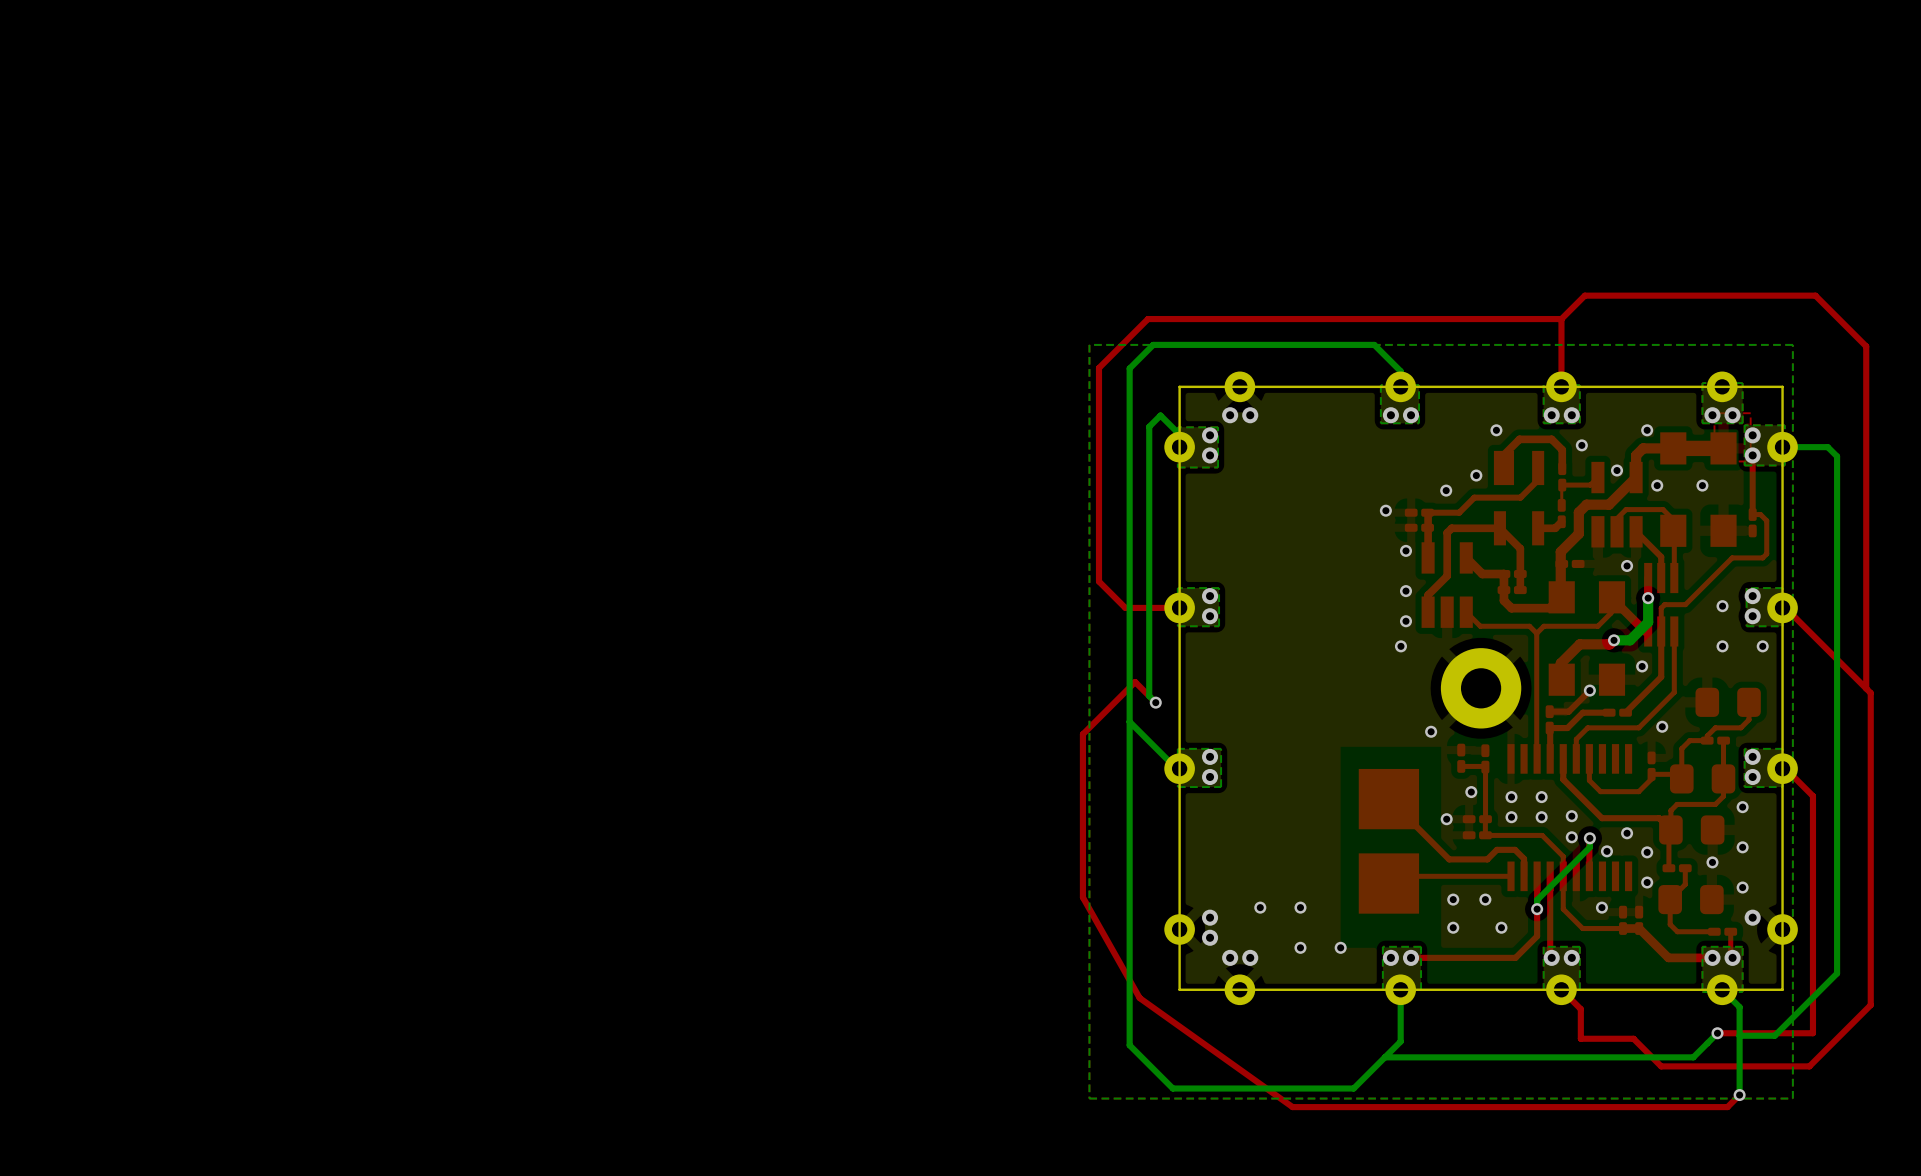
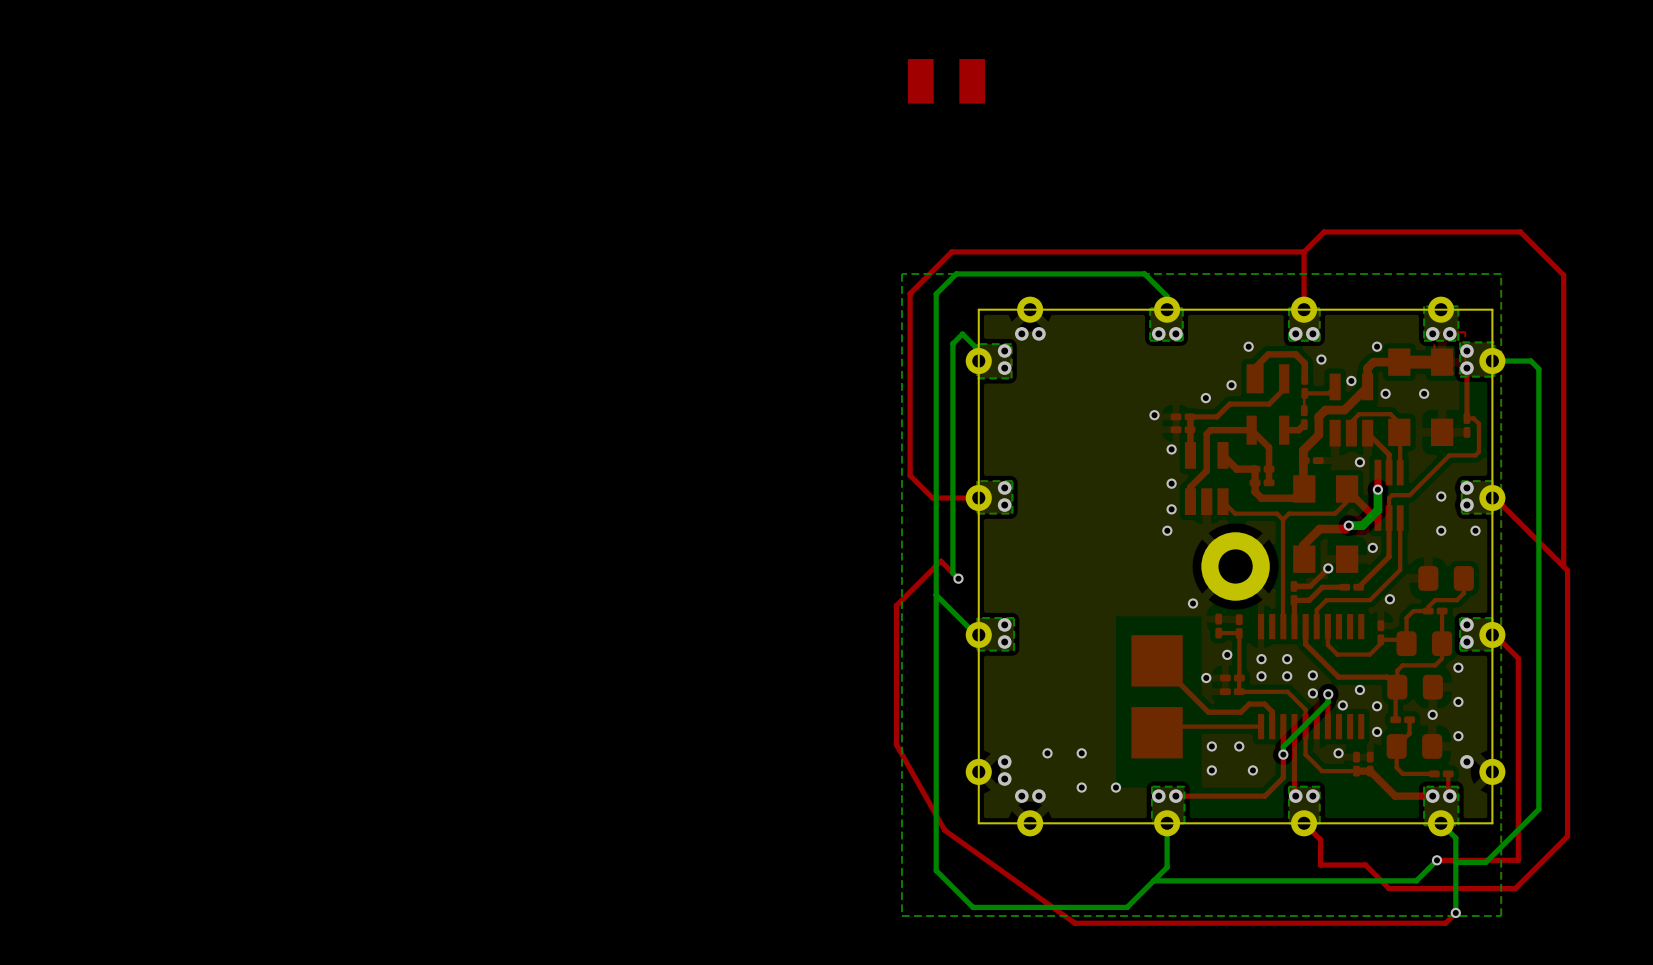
part: none -> (946, 81)

